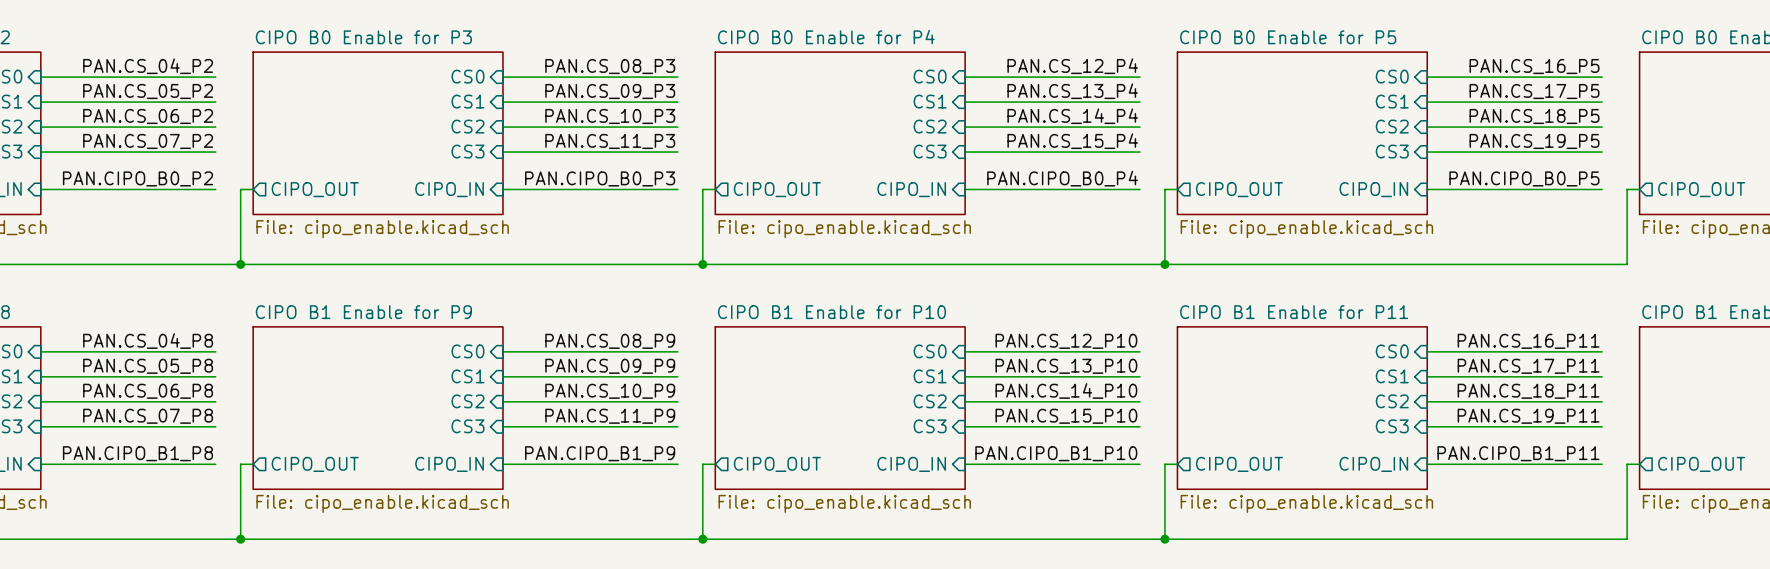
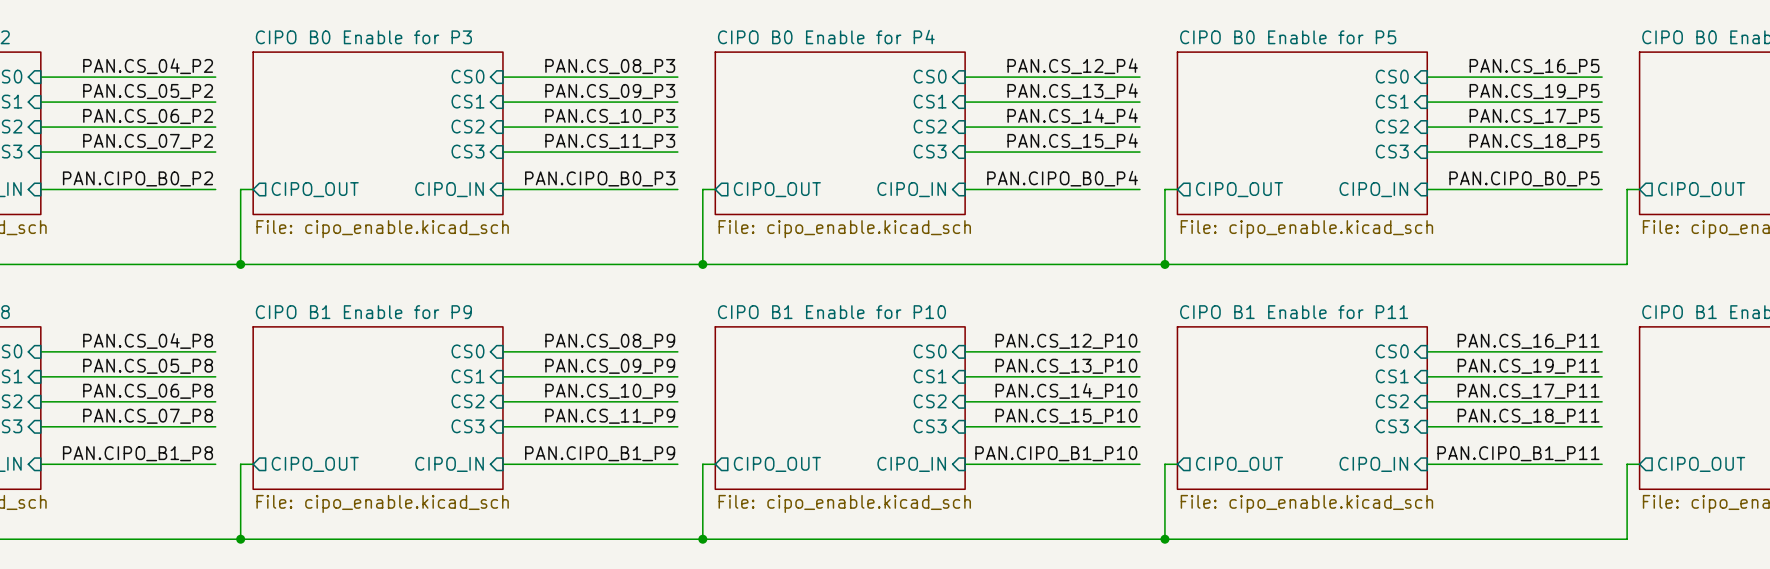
label: PAN.CS_17_P5 (1534, 91) -> PAN.CS_19_P5 (1534, 91)
label: PAN.CS_18_P5 (1534, 116) -> PAN.CS_17_P5 (1534, 116)
label: PAN.CS_19_P5 (1534, 141) -> PAN.CS_18_P5 (1534, 141)
label: PAN.CS_17_P11 (1528, 366) -> PAN.CS_19_P11 (1528, 366)
label: PAN.CS_18_P11 (1528, 391) -> PAN.CS_17_P11 (1528, 391)
label: PAN.CS_19_P11 (1528, 416) -> PAN.CS_18_P11 (1528, 416)

